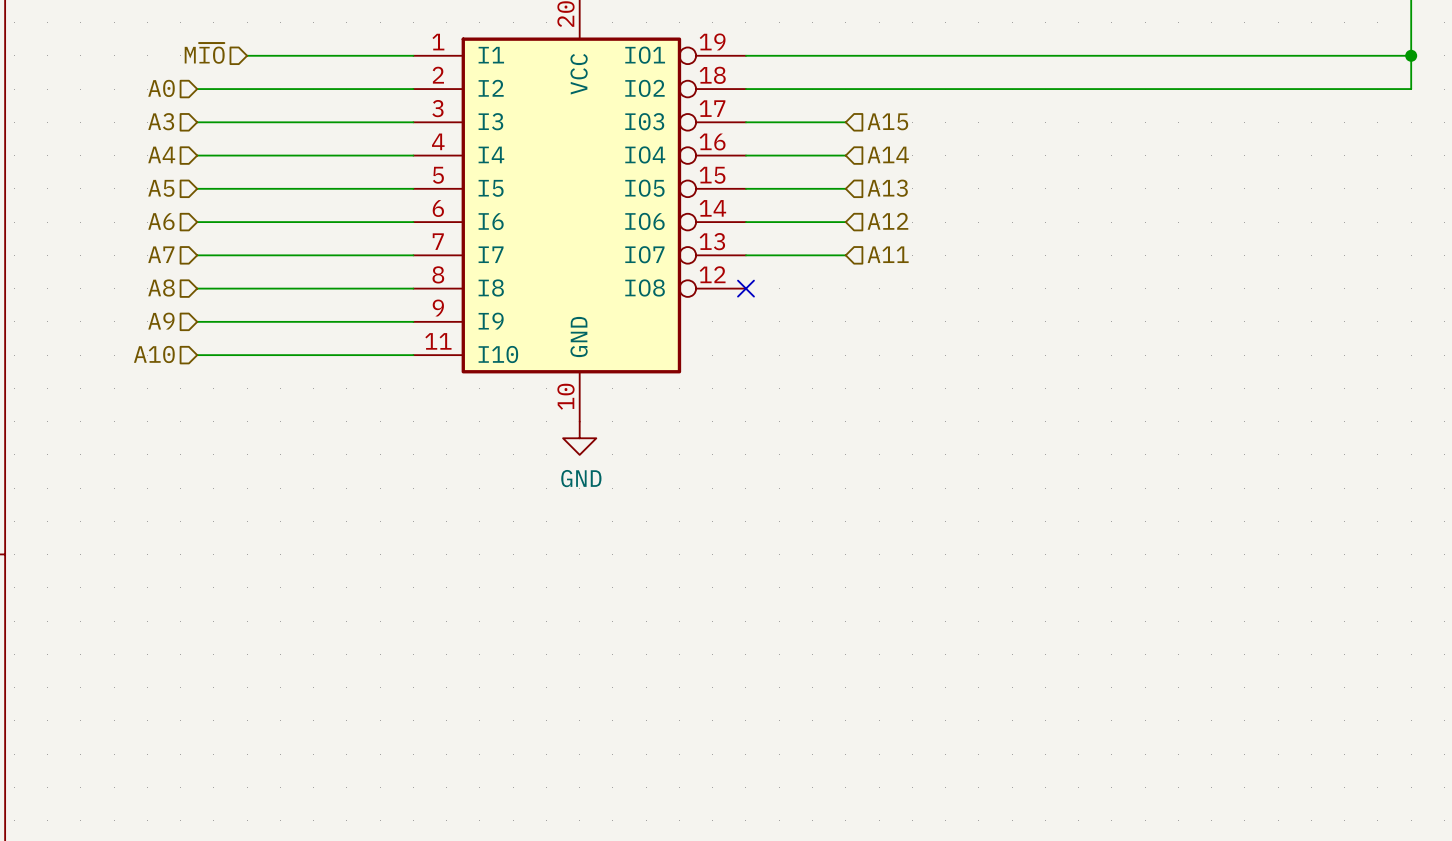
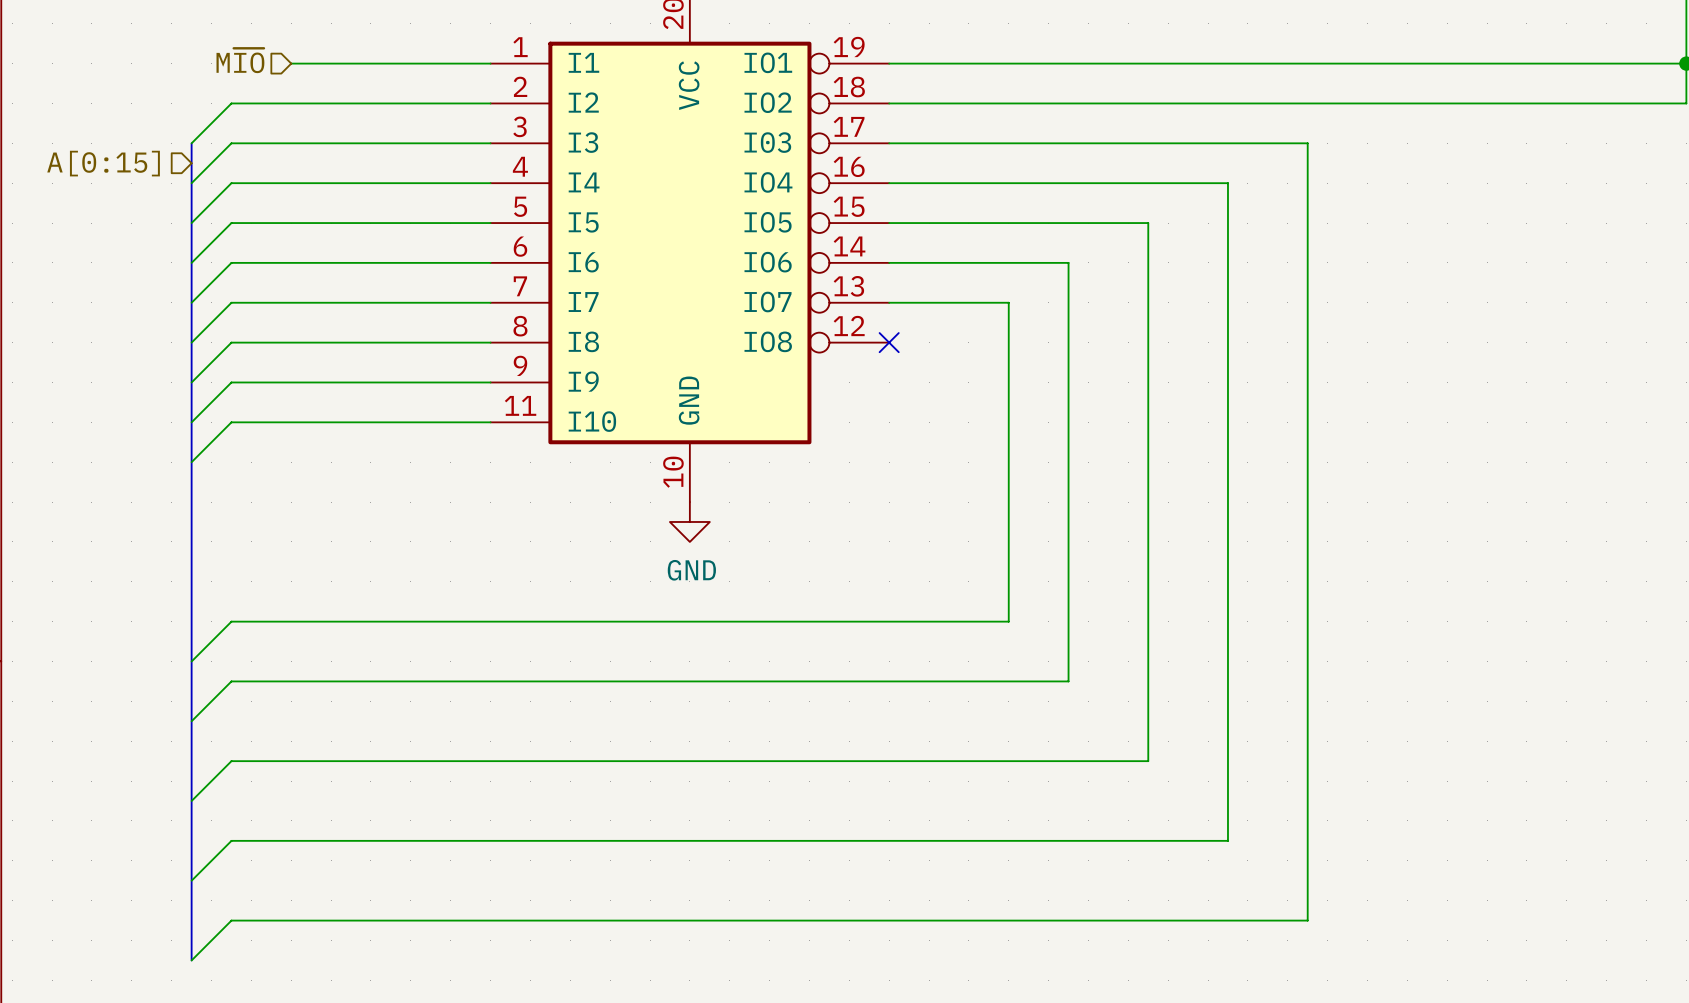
hierarchical label: A0 (161, 88) -> none
wire: none -> (231, 103) (191, 143)
hierarchical label: A3 (161, 121) -> none
hierarchical label: A15 (887, 121) -> none
bus: none -> (191, 143) (191, 960)
wire: none -> (231, 143) (191, 183)
wire: none -> (1008, 143) (1307, 143) (1307, 920) (231, 920) (191, 960)
hierarchical label: none -> A[0:15] (103, 163)
hierarchical label: A4 (161, 154) -> none
hierarchical label: A14 (888, 154) -> none
wire: none -> (231, 183) (191, 223)
wire: none -> (1008, 183) (1227, 183) (1227, 840) (231, 840) (191, 880)
hierarchical label: A5 (161, 188) -> none
wire: none -> (231, 223) (191, 262)
wire: none -> (1008, 223) (1148, 223) (1148, 761) (231, 761) (191, 801)
hierarchical label: A13 (887, 188) -> none
hierarchical label: A6 (161, 221) -> none
hierarchical label: A12 (887, 221) -> none
wire: none -> (231, 262) (191, 302)
wire: none -> (1008, 262) (1068, 262) (1068, 681) (231, 681) (191, 721)
hierarchical label: A7 (161, 254) -> none
hierarchical label: A11 (888, 254) -> none
wire: none -> (231, 302) (191, 342)
wire: none -> (1008, 302) (1008, 621) (231, 621) (191, 661)
hierarchical label: A8 (161, 287) -> none
wire: none -> (231, 342) (191, 382)
hierarchical label: A9 (161, 321) -> none
wire: none -> (231, 382) (191, 422)
hierarchical label: A10 (154, 354) -> none
wire: none -> (231, 422) (191, 462)

